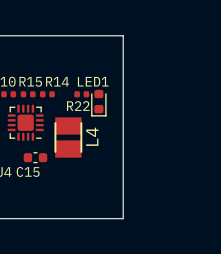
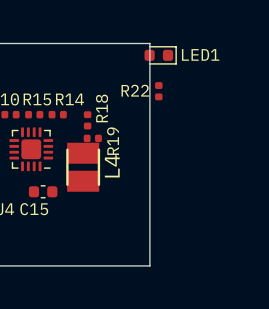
LED1 name position: LED1 (93, 81) -> LED1 (200, 54)
R22 rotation: 0° (81, 94) -> 90° clockwise (158, 91)
R22 position: (81, 94) -> (158, 91)
R18: none -> (87, 120)
LED1 rotation: 0° (98, 103) -> 90° counterclockwise (160, 55)
LED1 position: (98, 103) -> (160, 55)
R19: none -> (92, 138)

